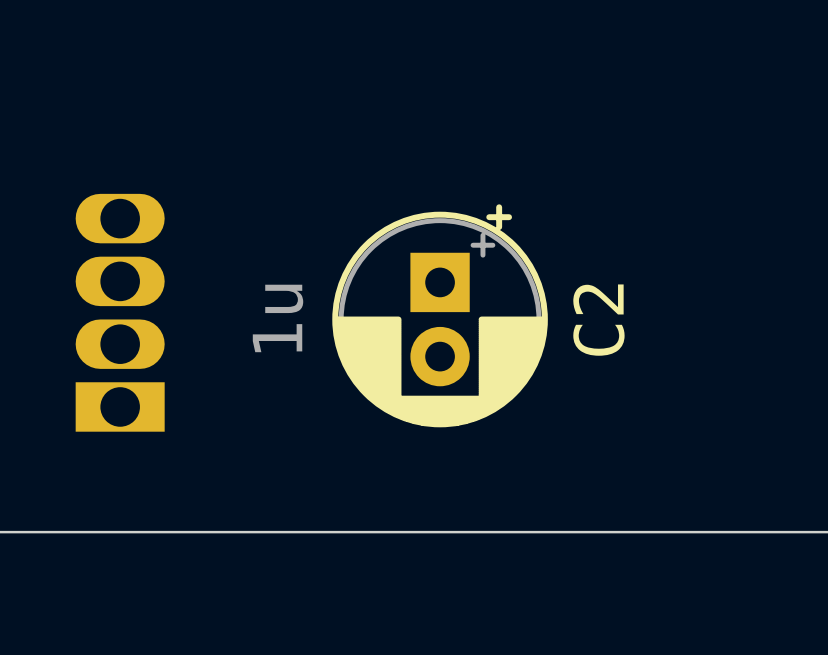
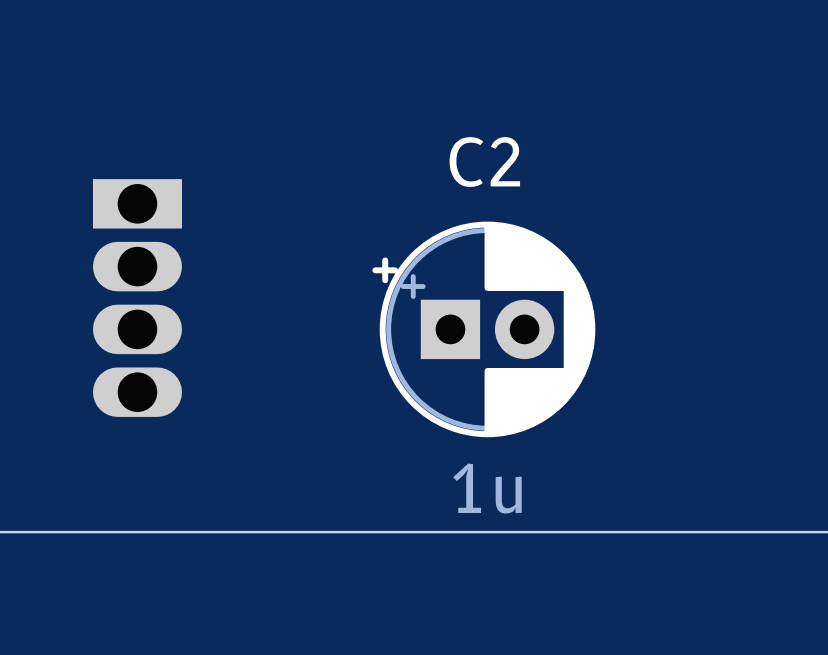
part rotation: 0° (120, 312) -> 180° (137, 298)
C2 rotation: 0° (440, 315) -> 90° counterclockwise (483, 329)

